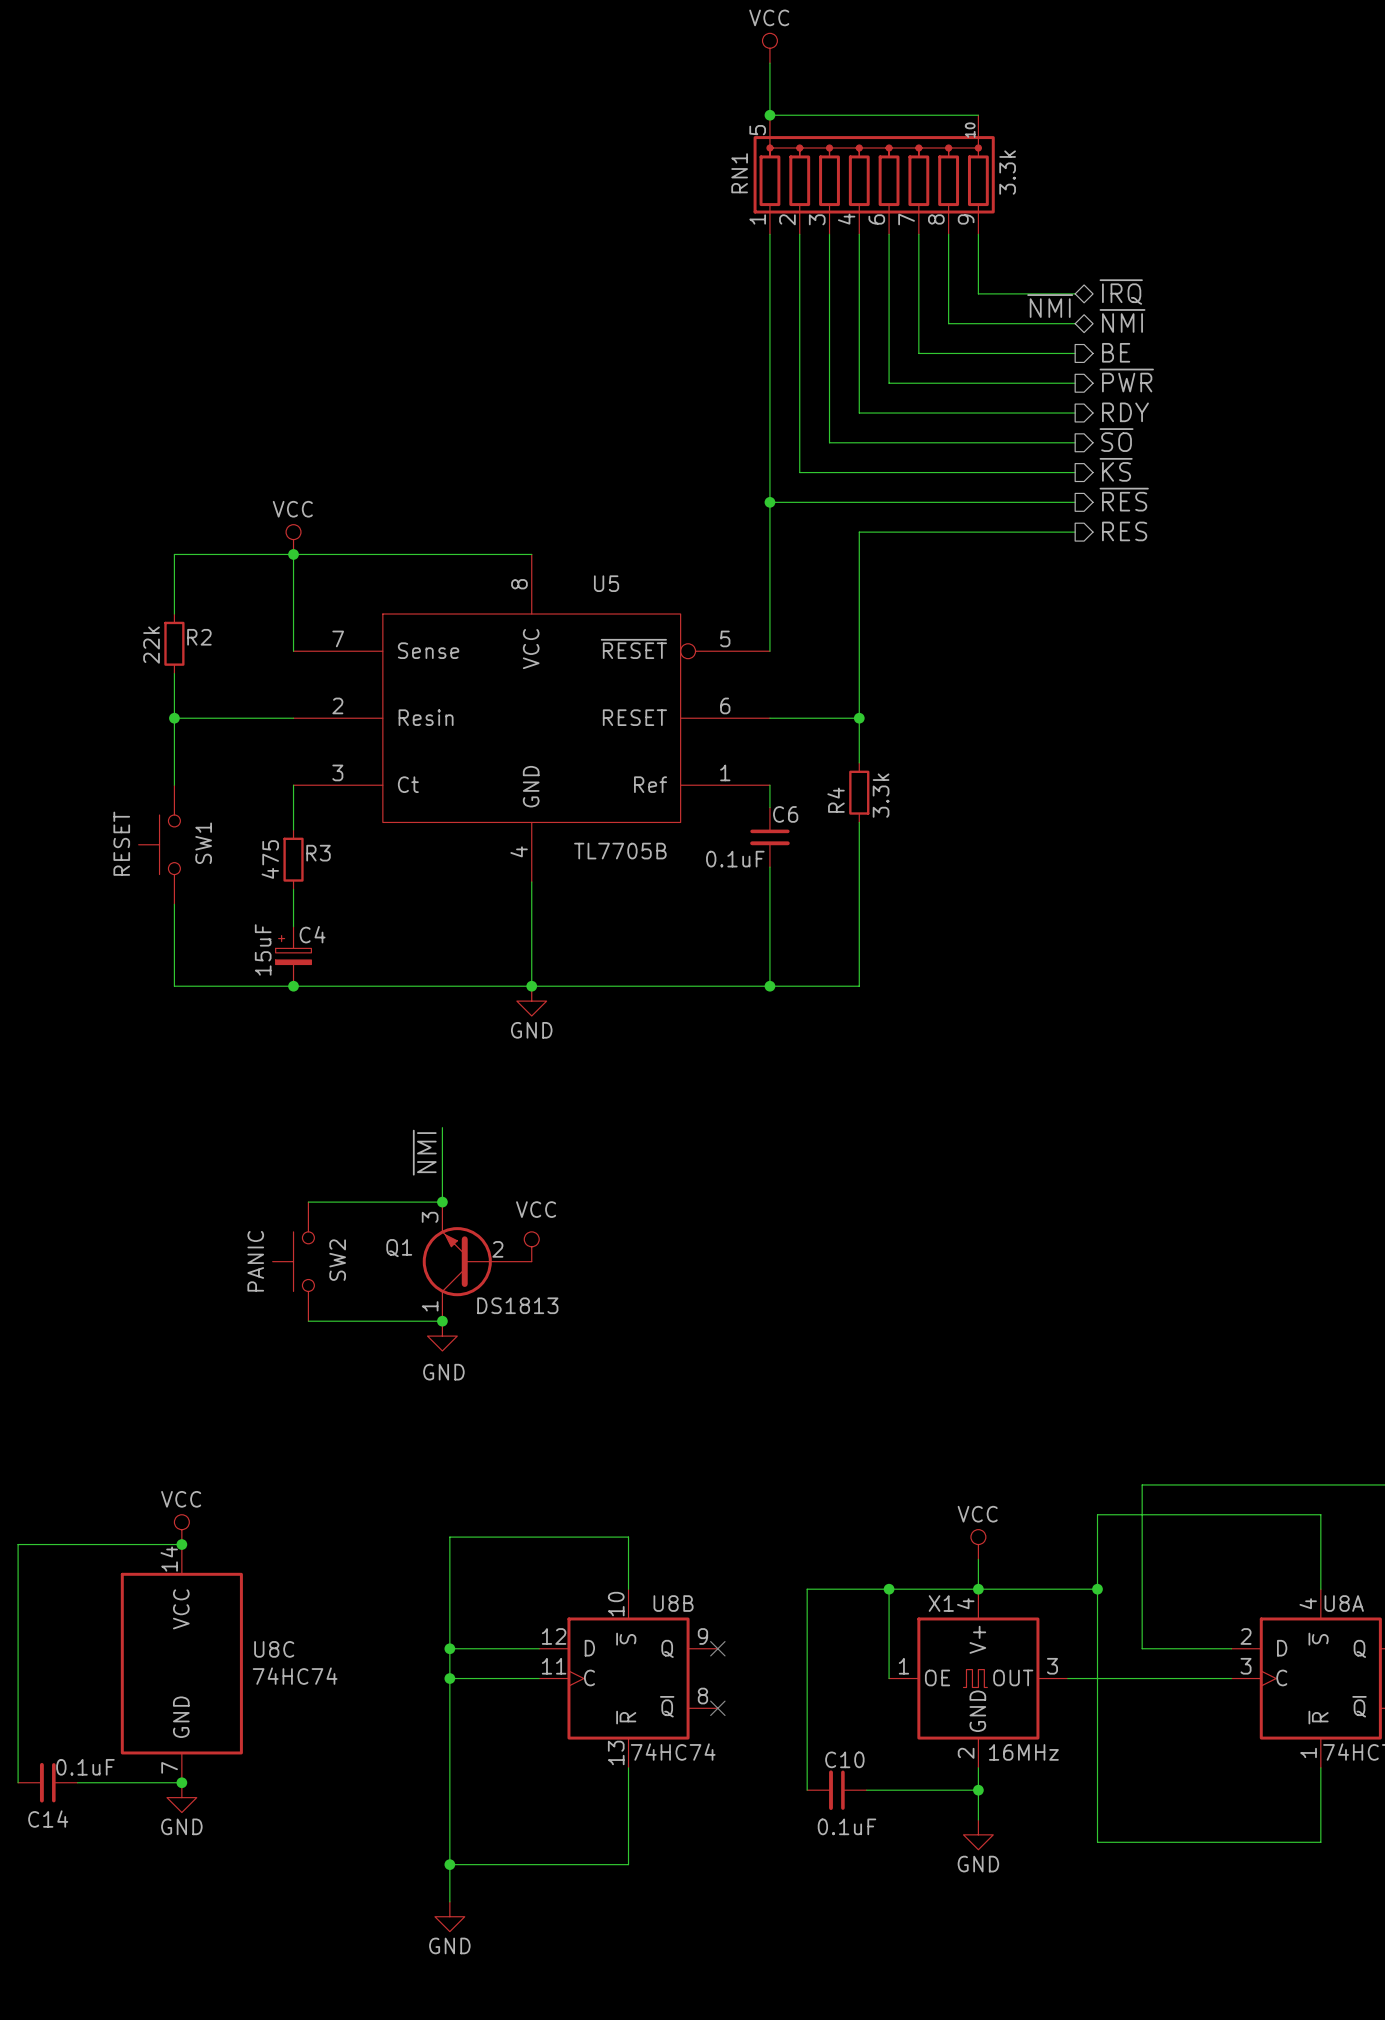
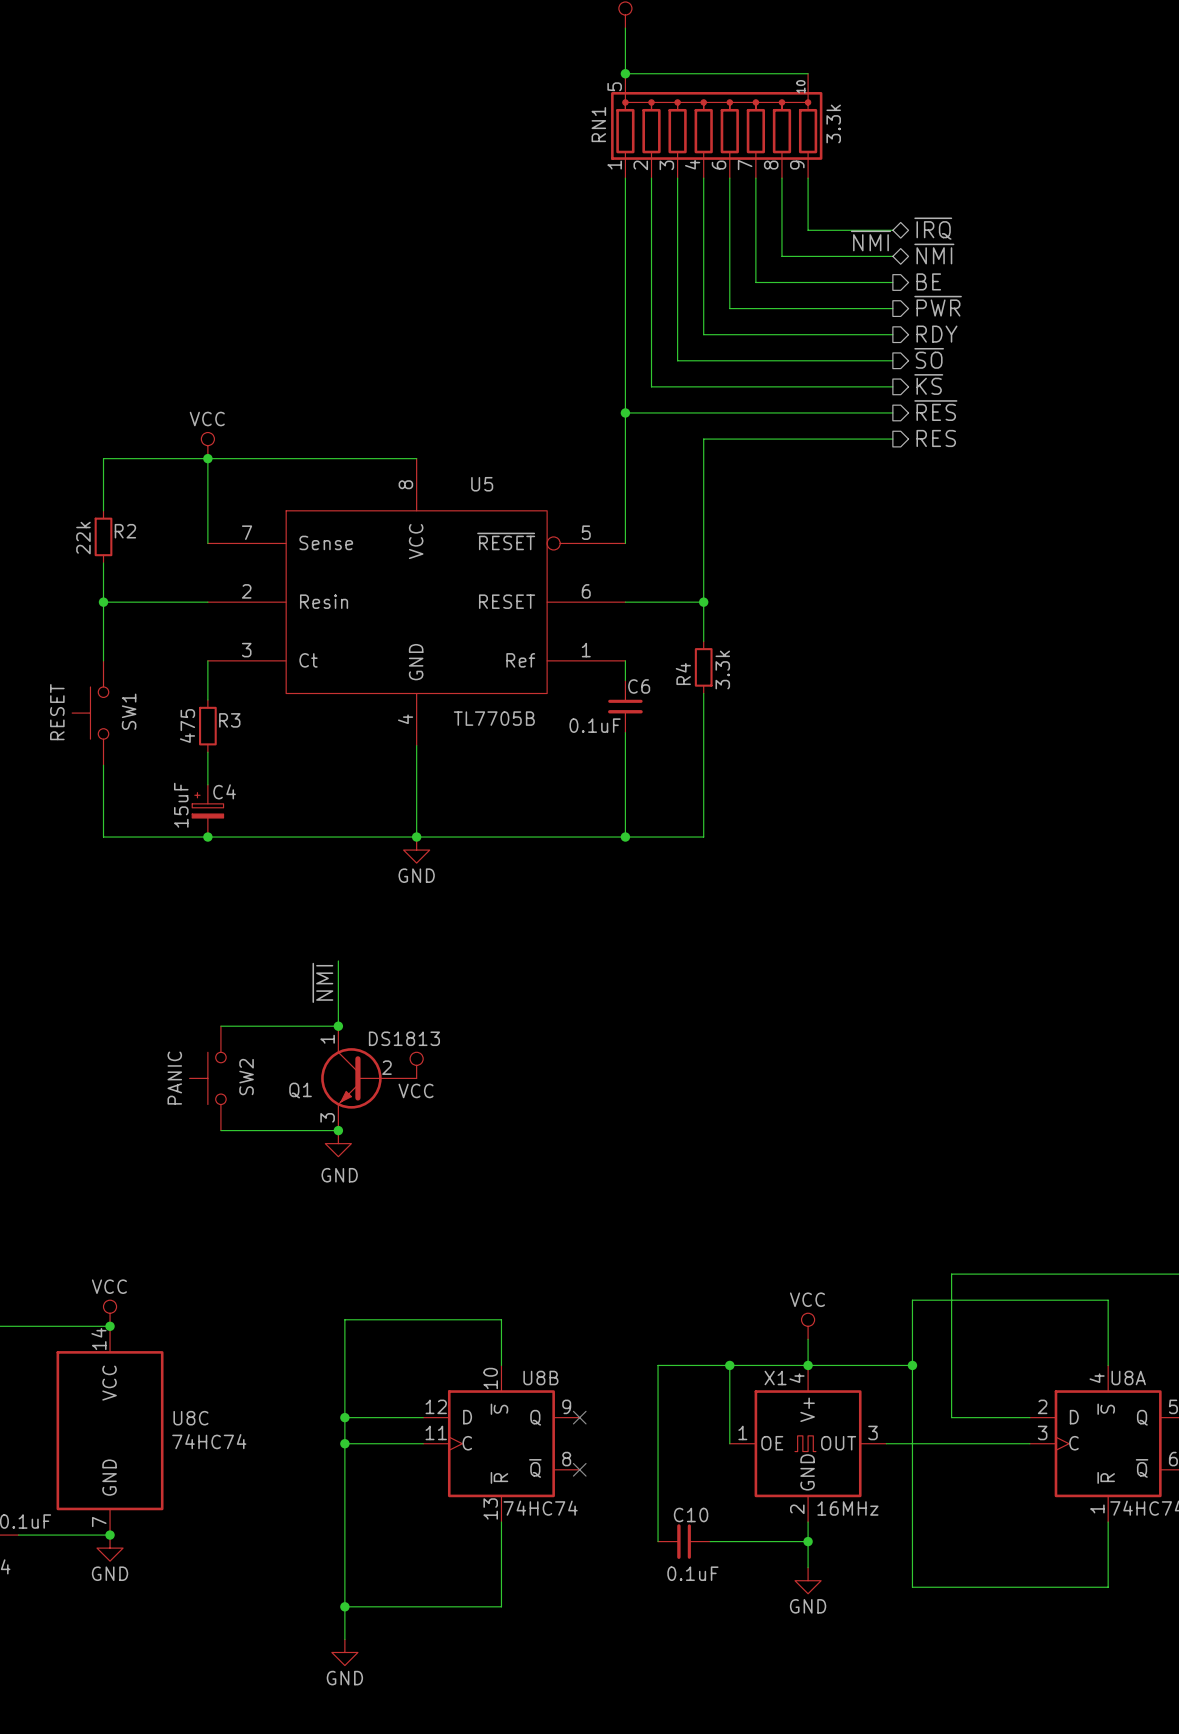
power symbol text position: VCC (536, 1209) -> VCC (416, 1090)
Q1 flip: as is (457, 1261) -> up-down (351, 1078)

